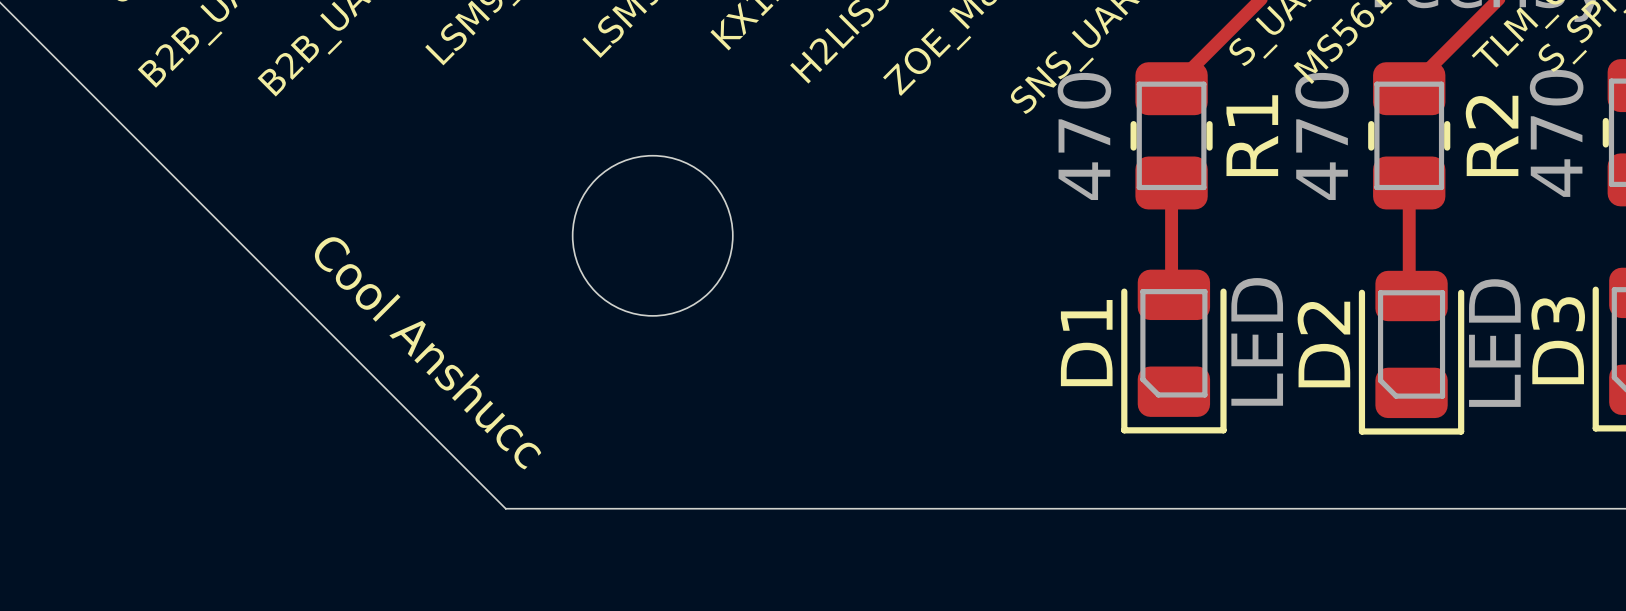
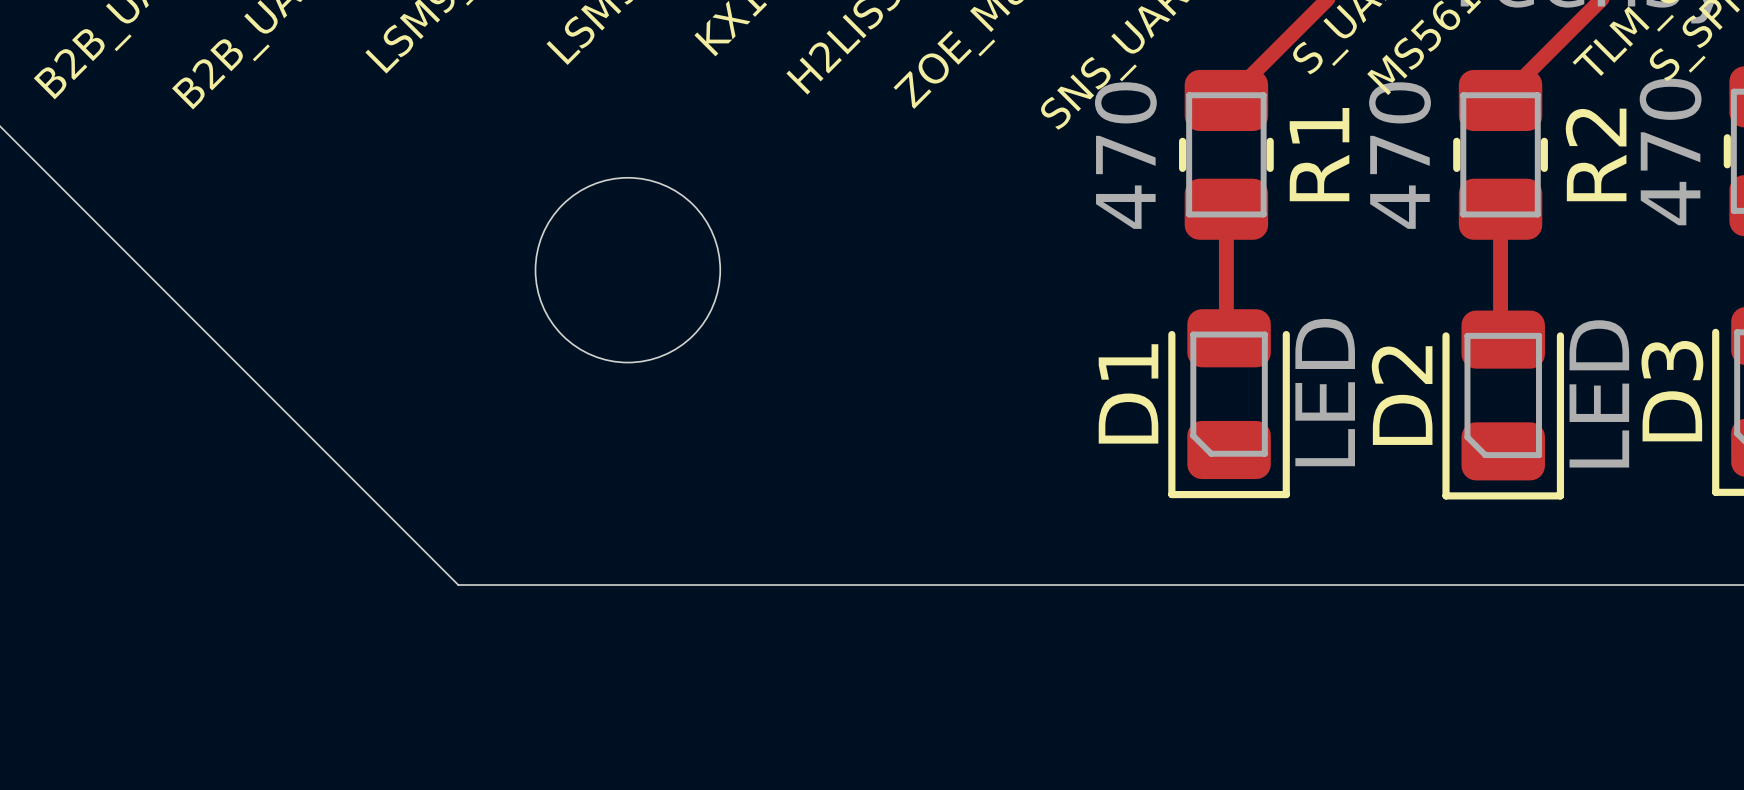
text: Cool Anshucc (427, 353) -> none

